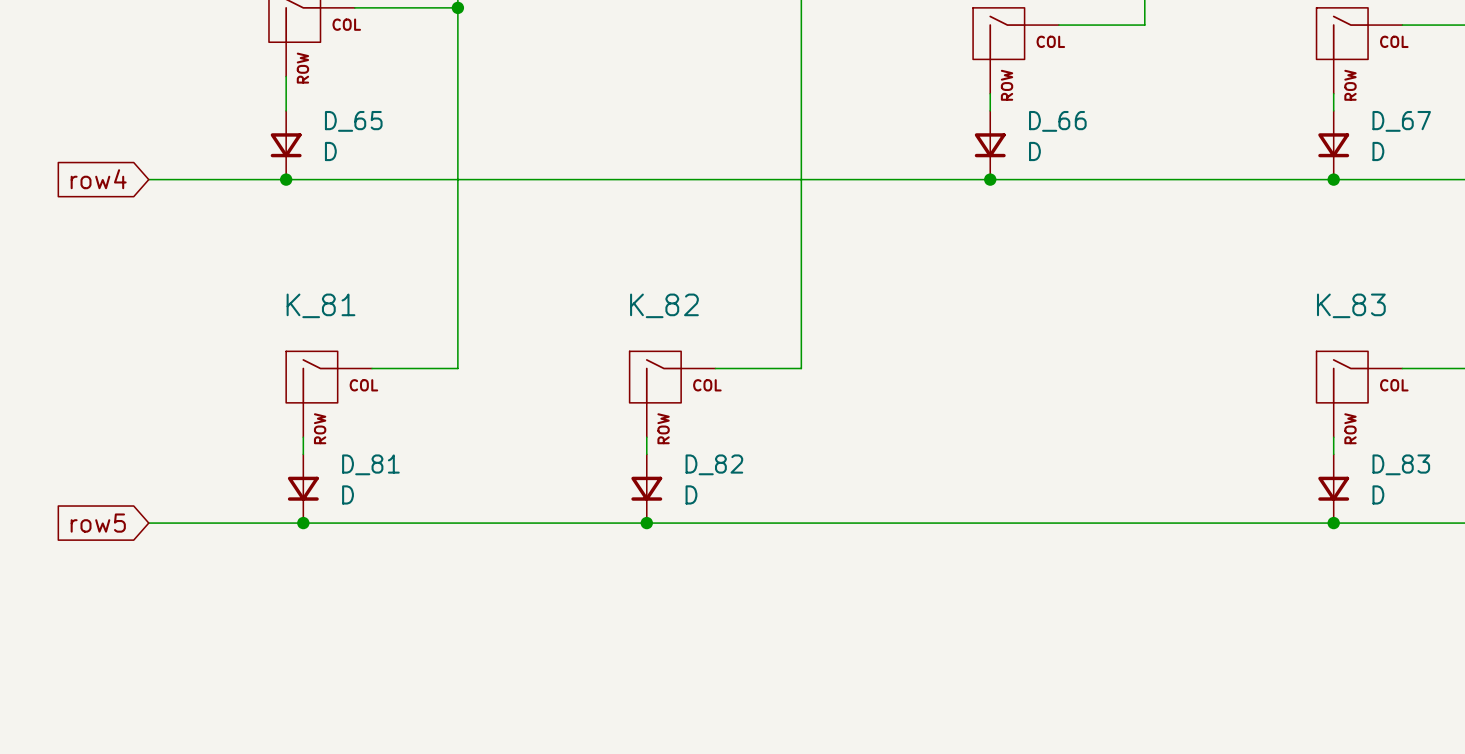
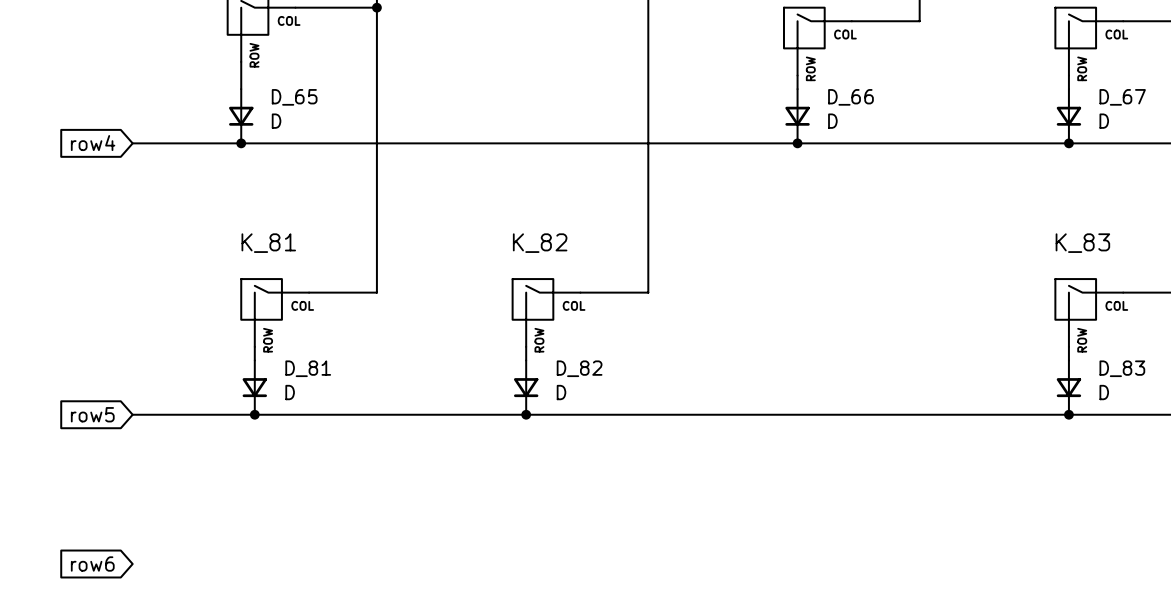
global label: none -> row6 (92, 564)

